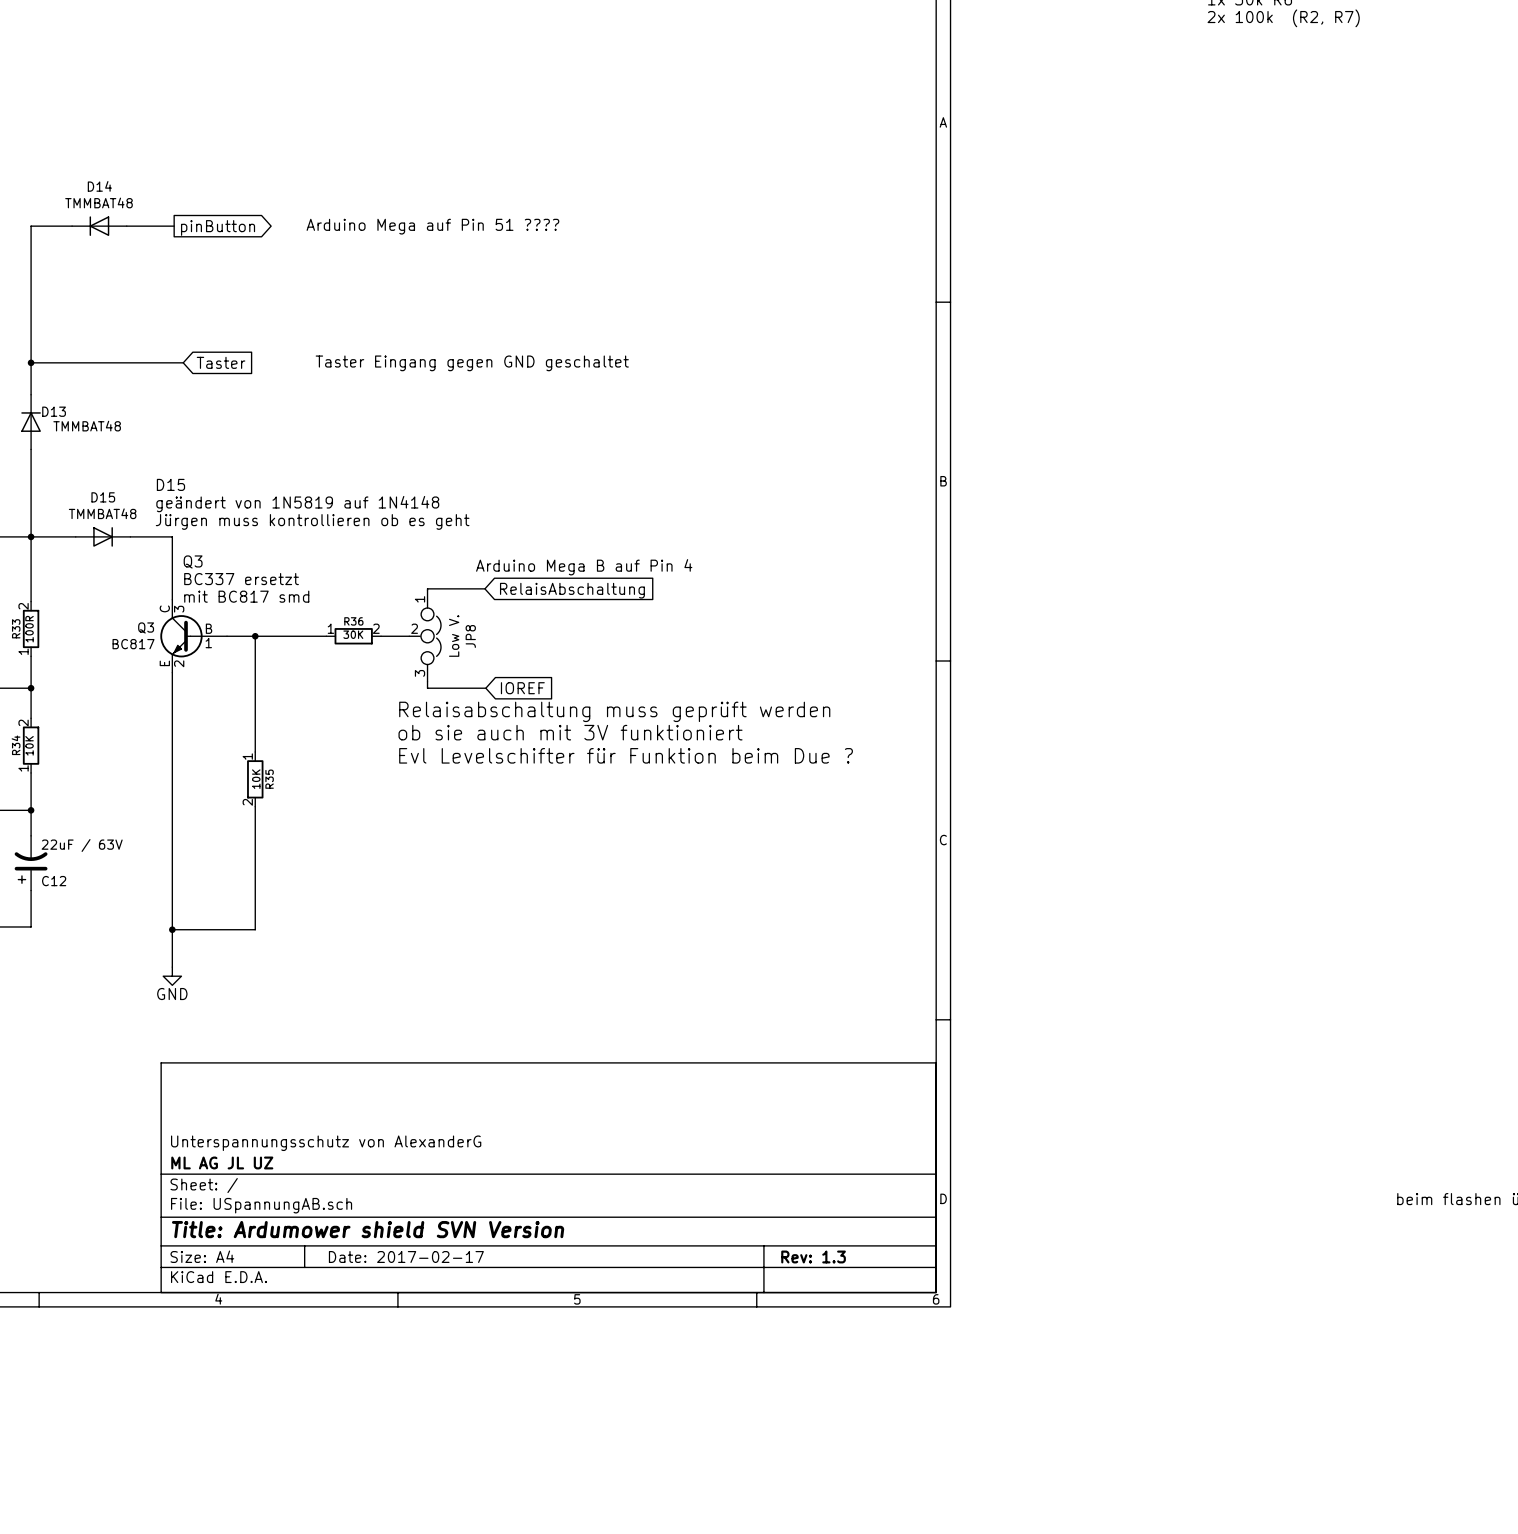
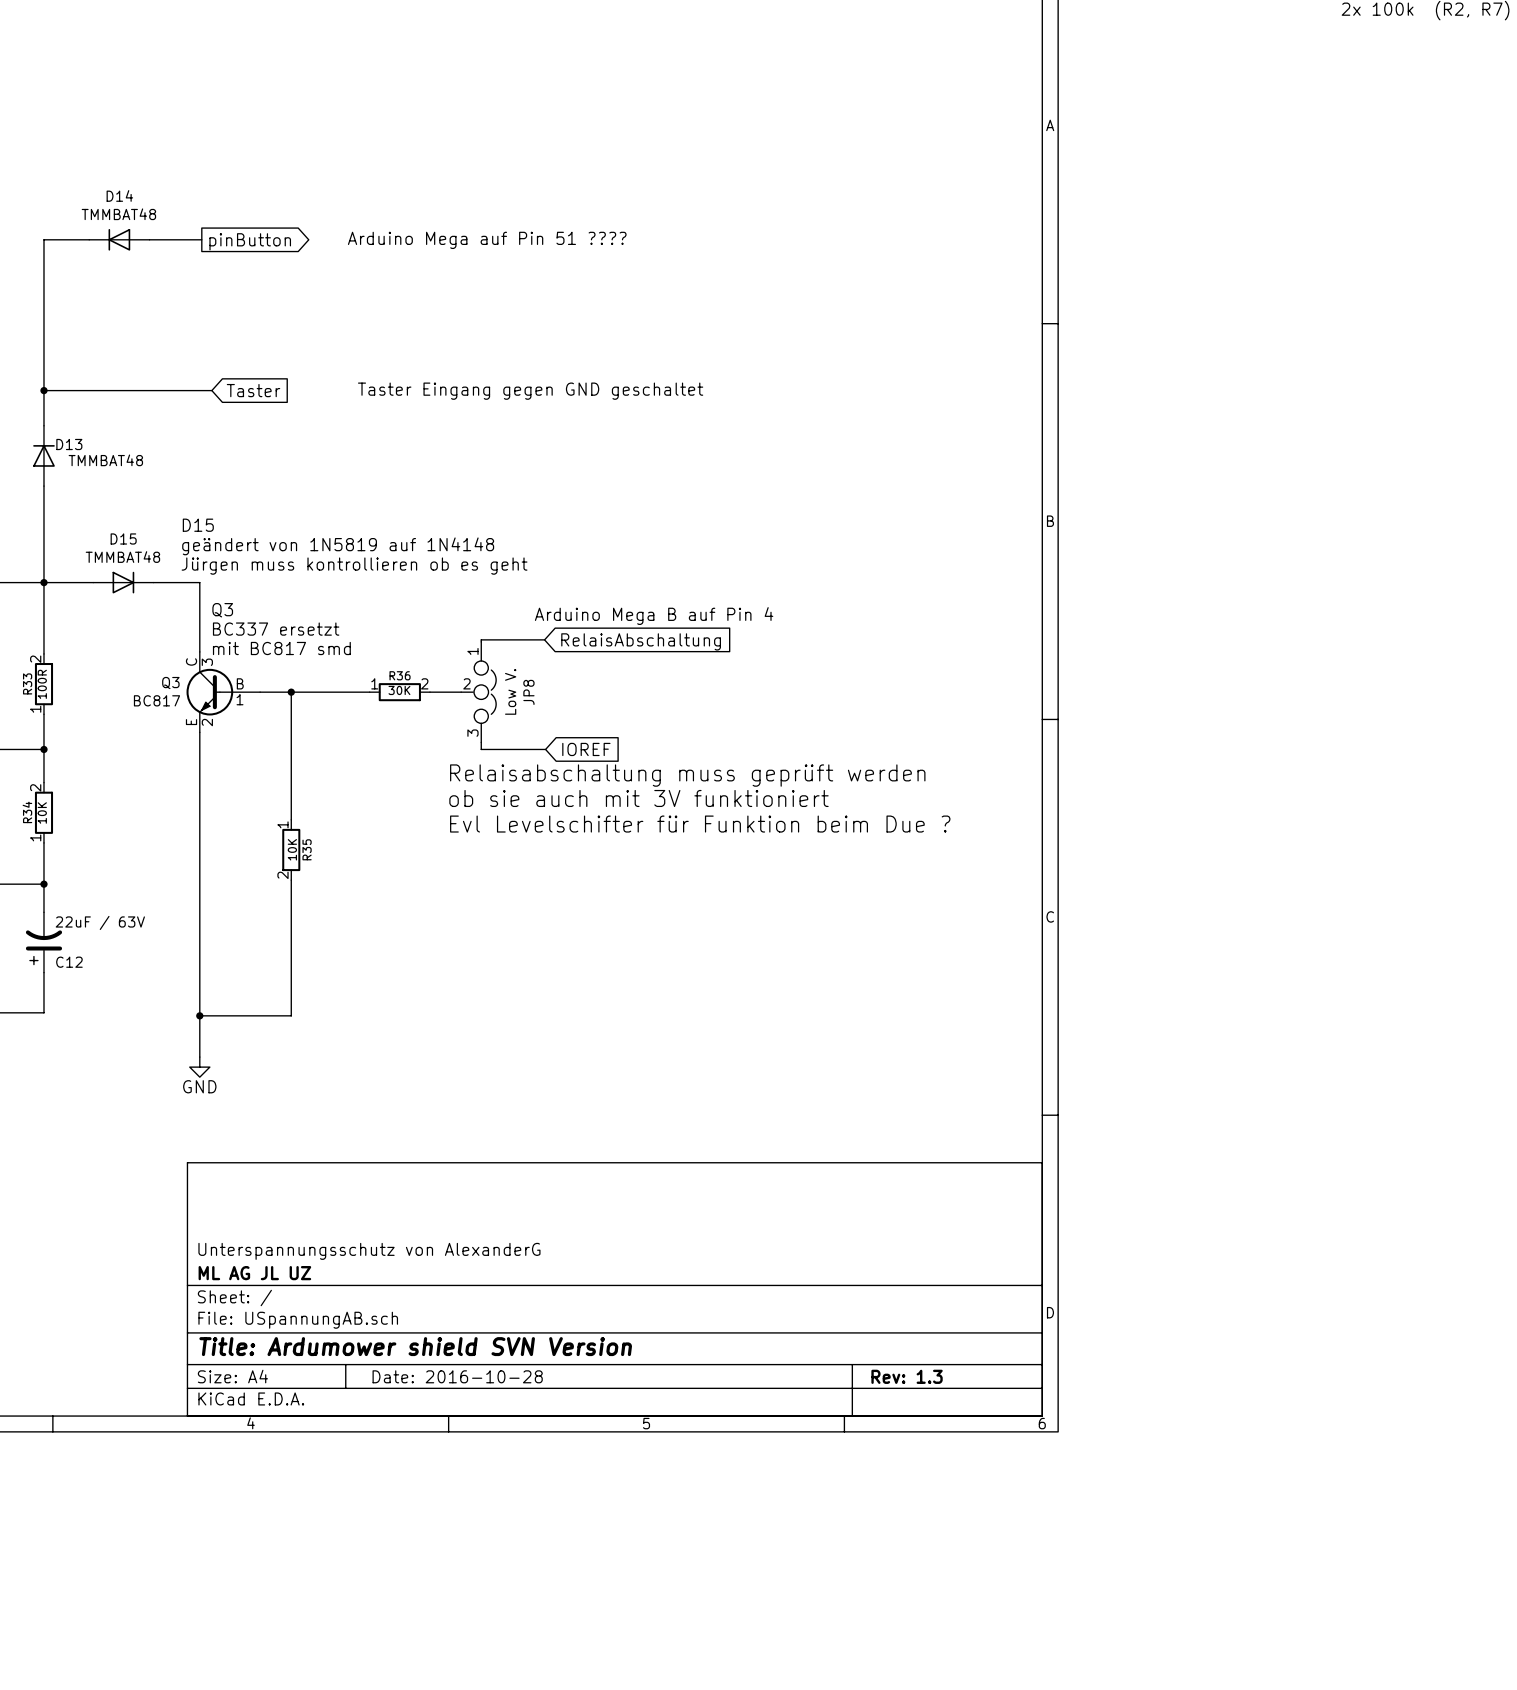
title block: Date: 2017-02-17 (406, 1256) -> Date: 2016-10-28 (457, 1376)

